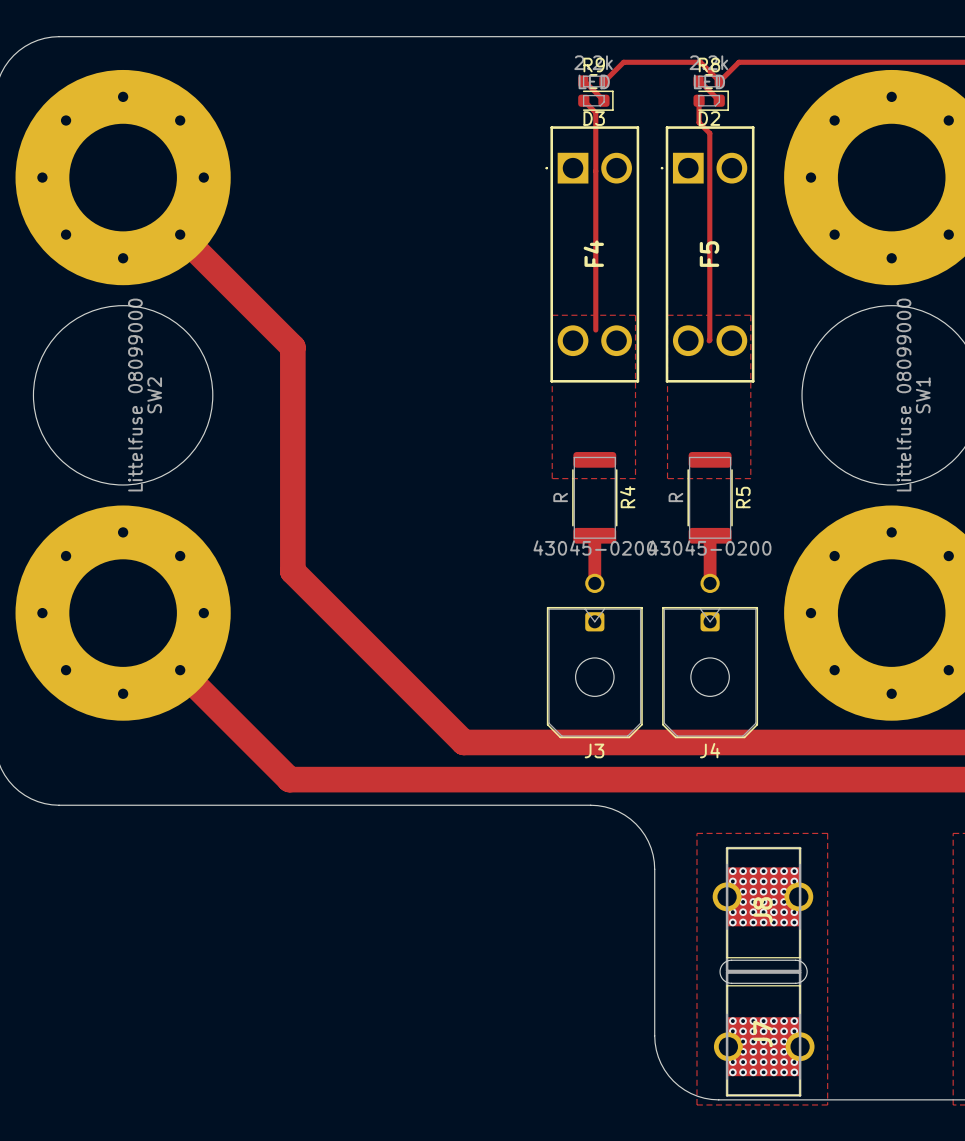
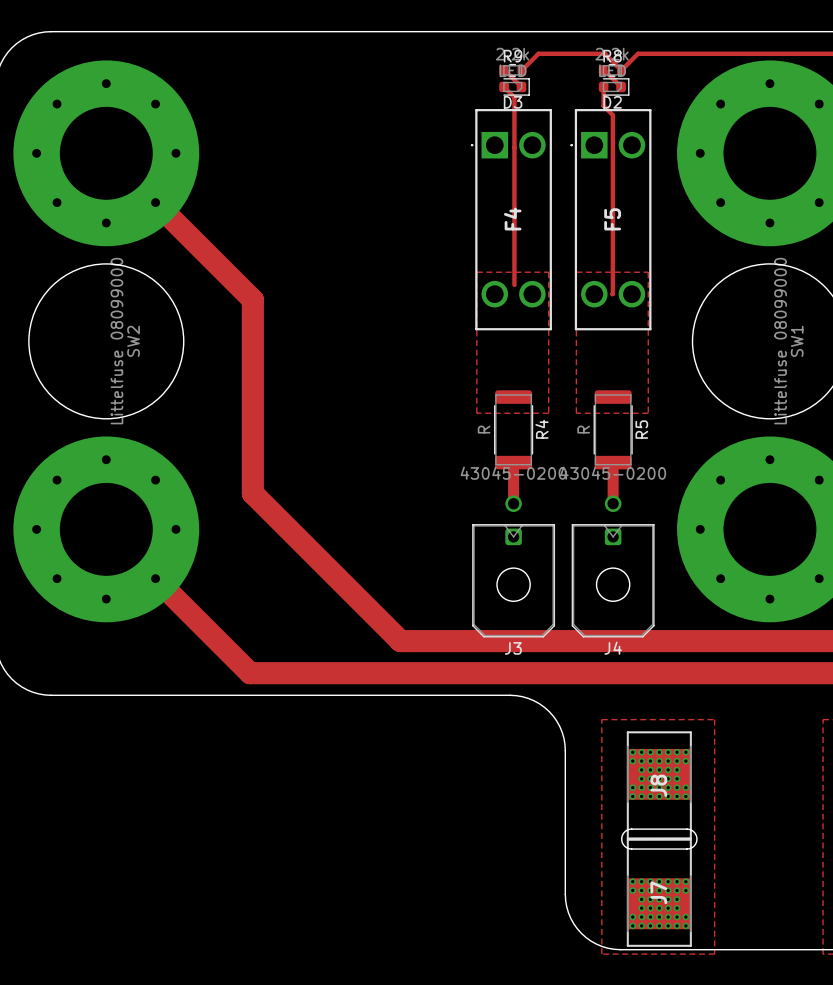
J8 footprint: [712, 846, 814, 973] -> [626, 731, 692, 840]
J7 footprint: [713, 971, 815, 1097] -> [626, 838, 692, 947]

